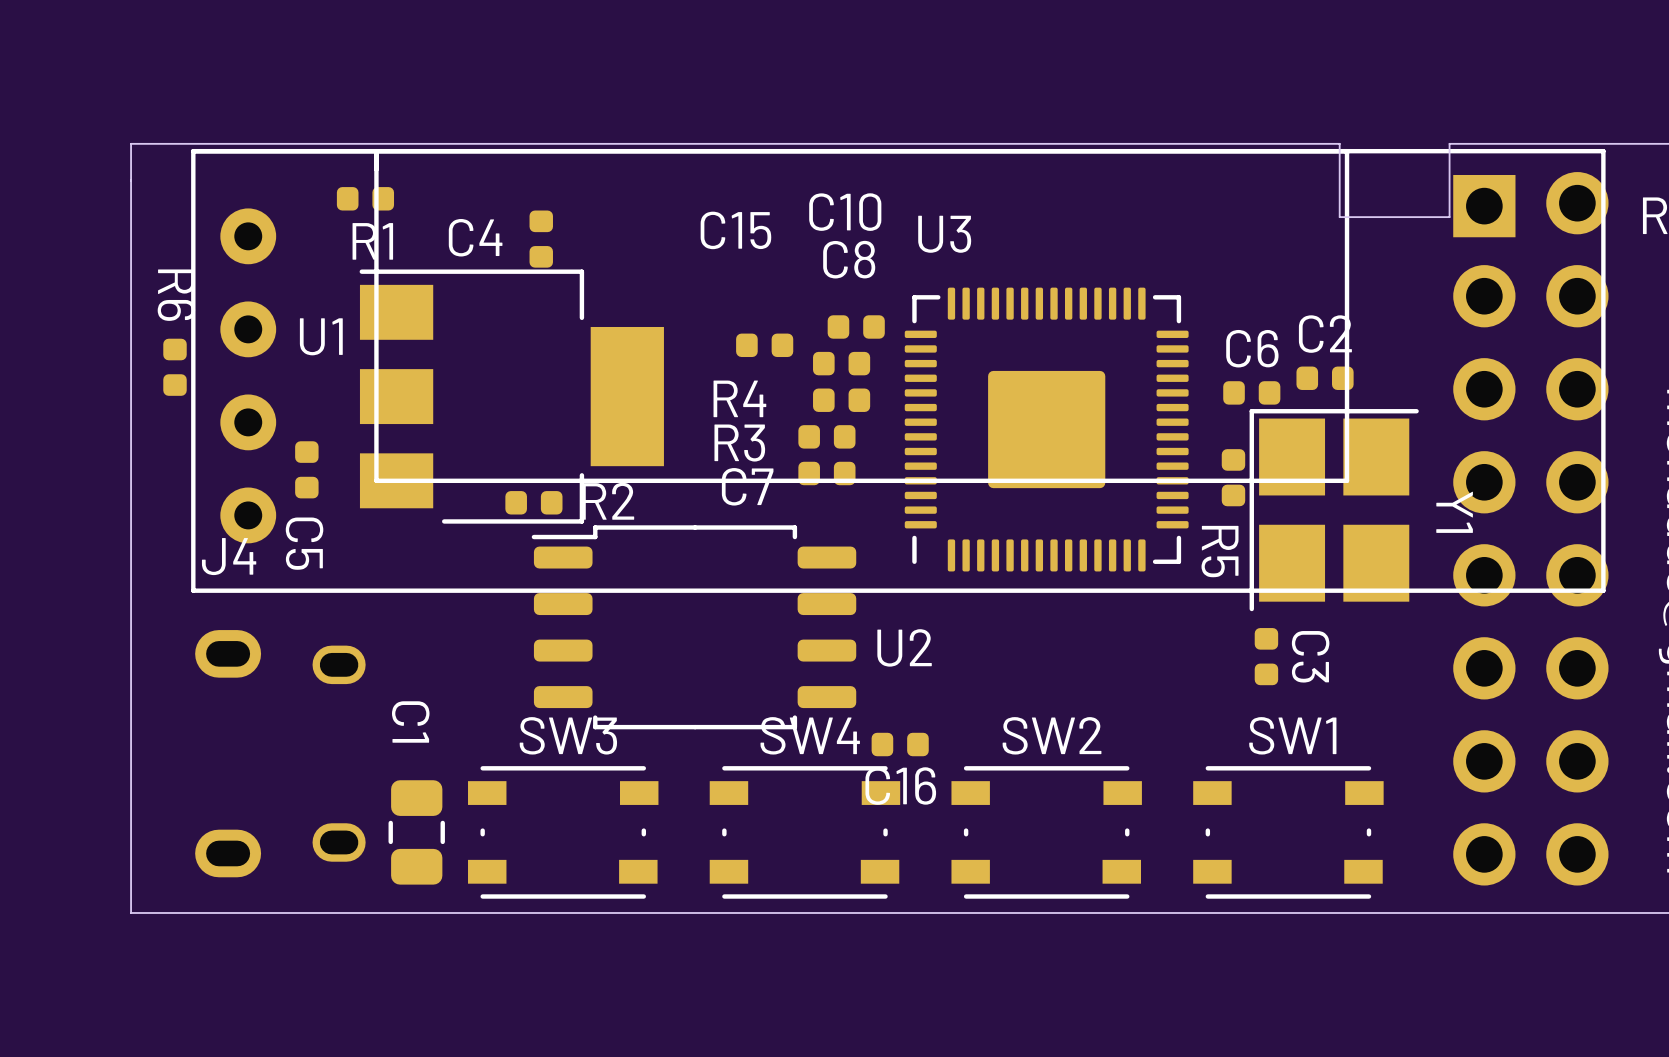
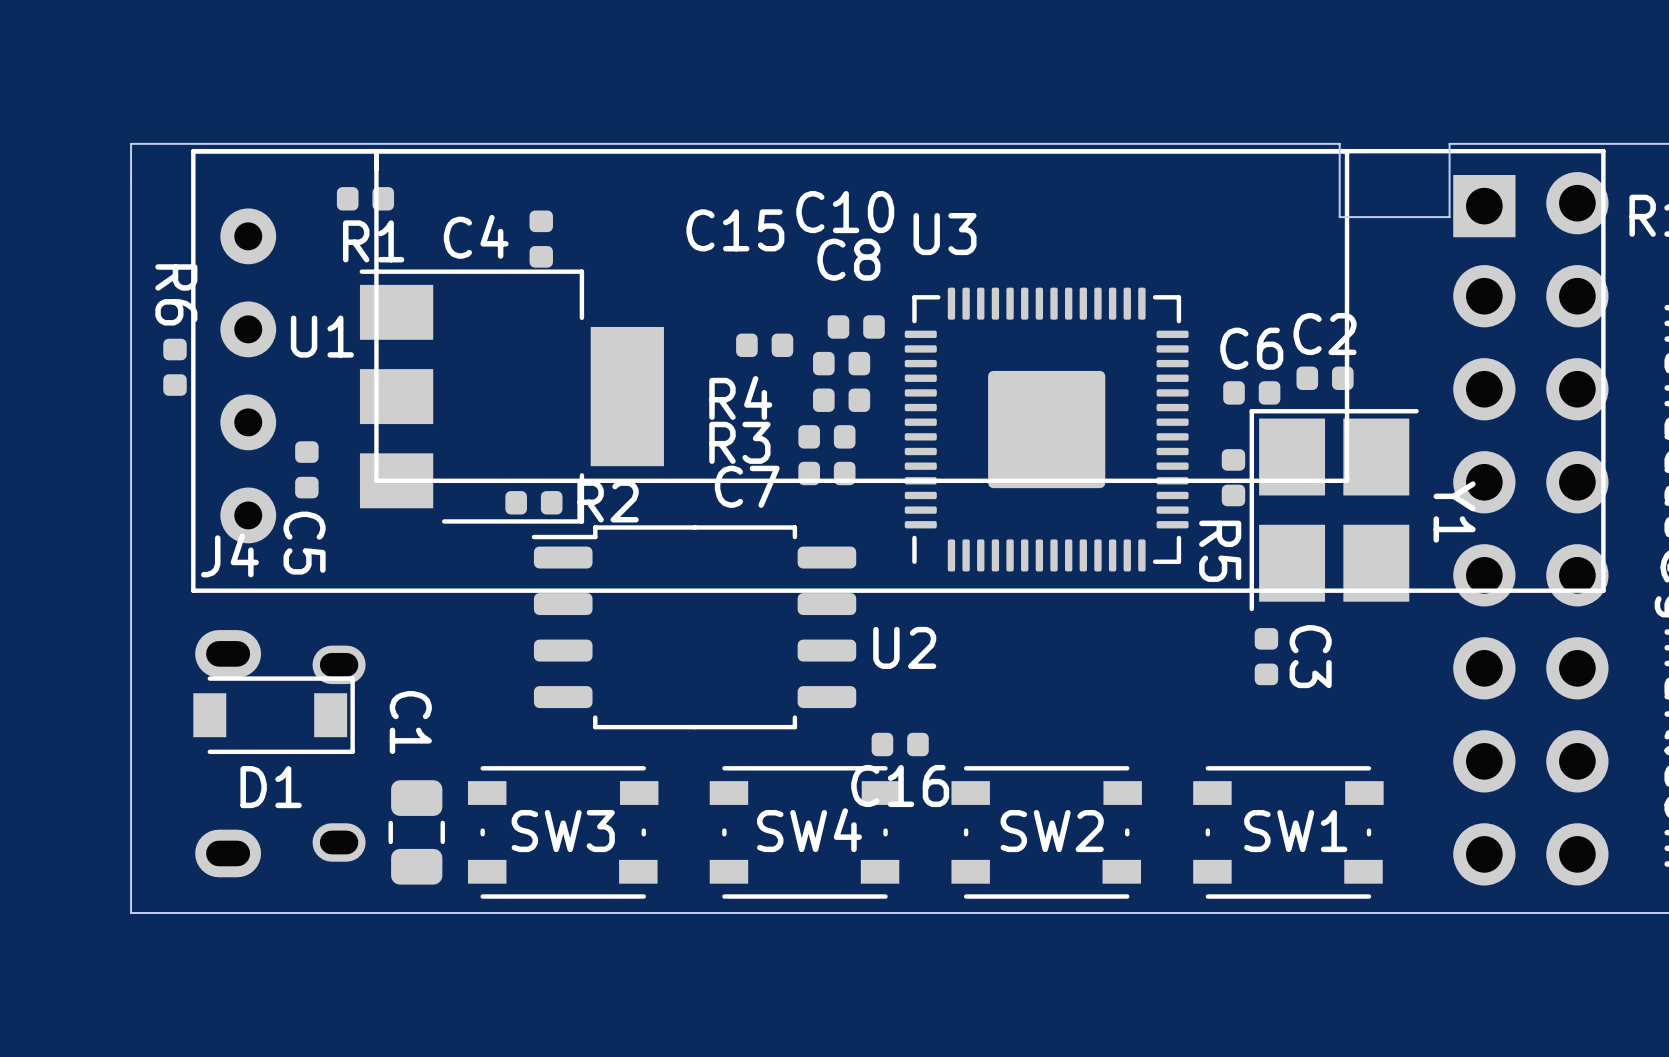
D1: none -> (274, 715)
SW3 name position: SW3 (568, 735) -> SW3 (563, 831)
SW4 name position: SW4 (810, 735) -> SW4 (809, 830)
SW2 name position: SW2 (1052, 735) -> SW2 (1052, 831)
SW1 name position: SW1 (1292, 735) -> SW1 (1295, 831)

